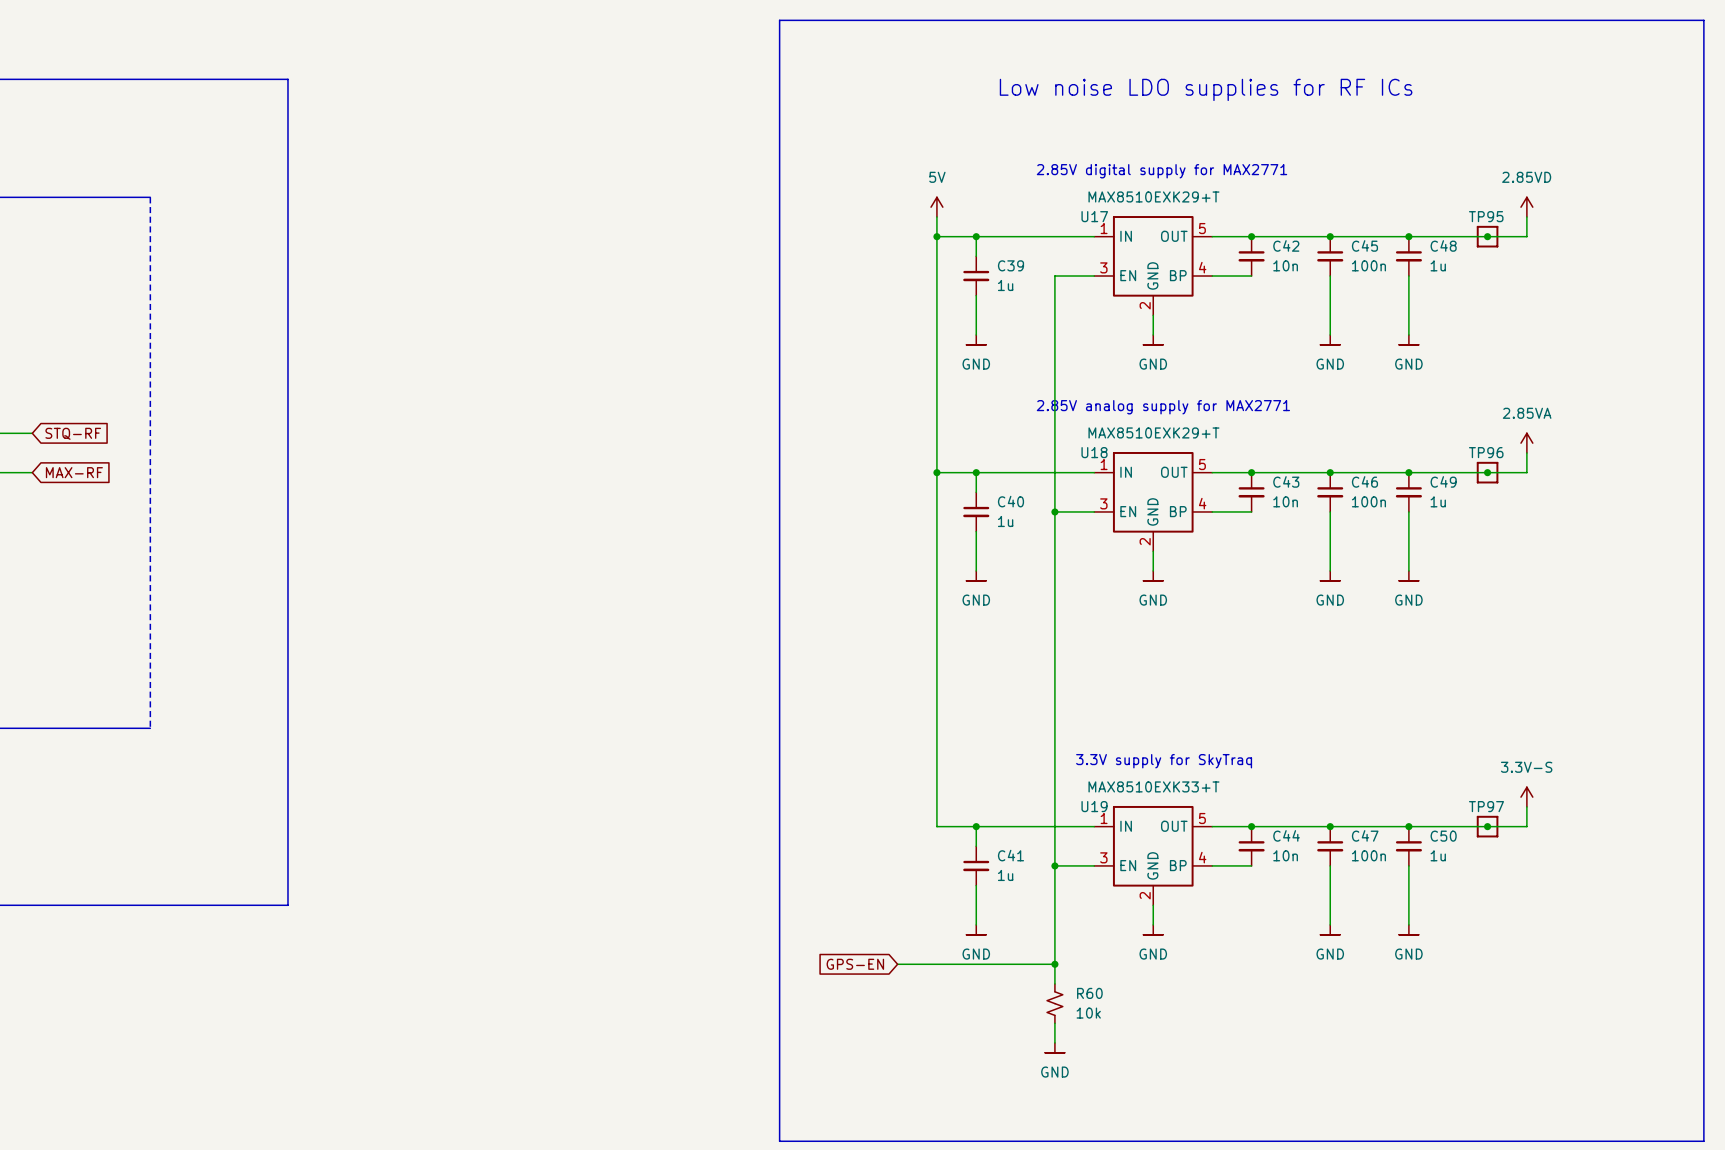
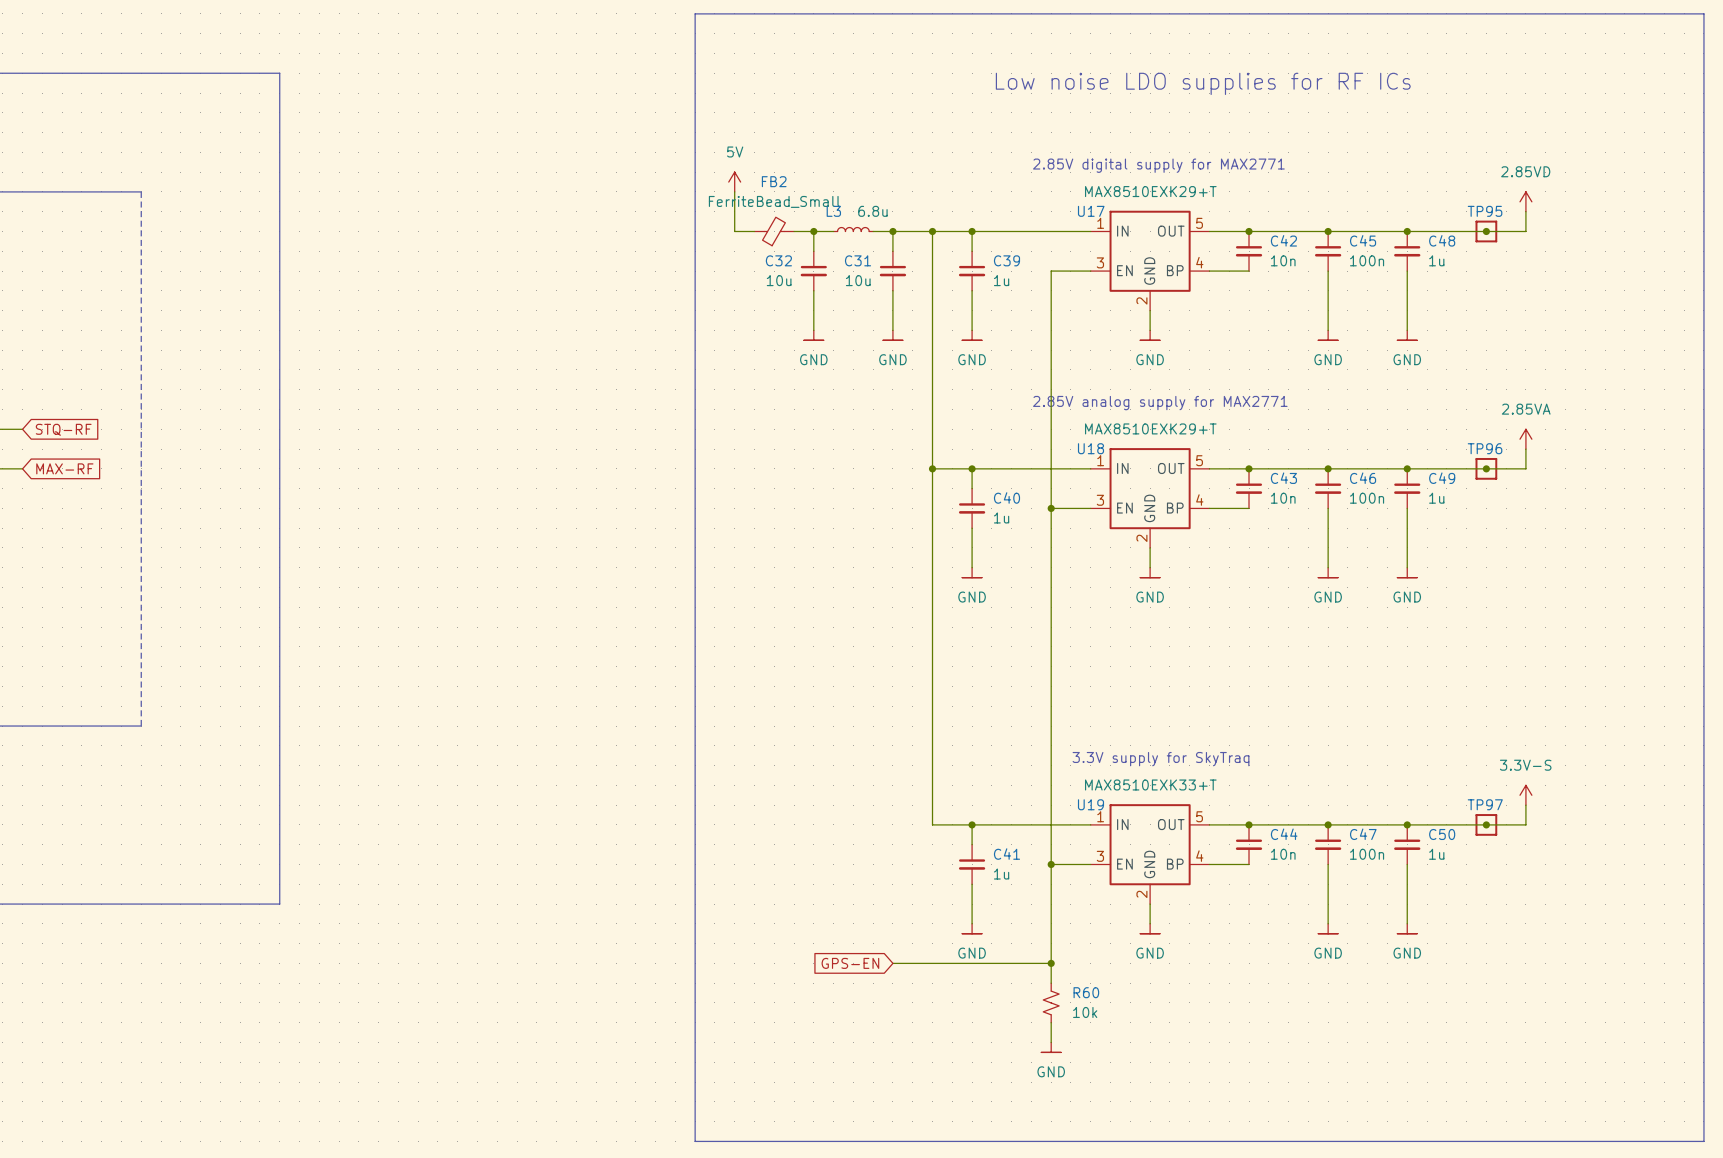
line: (779, 20) (779, 1141) -> (774, 13) (695, 13) (695, 1141) (774, 1141)
power symbol: none -> 5V (734, 182)
wire: none -> (734, 191) (734, 231) (754, 231)
power symbol: 5V (936, 207) -> none
wire: (936, 217) (936, 236) -> (873, 231) (932, 231)
L3: none -> 6.8u (853, 229)
FB2: none -> FerriteBead_Small (774, 231)
wire: none -> (794, 231) (833, 231)
wire: none -> (813, 231) (813, 251)
junction: none -> (813, 231)
wire: none -> (892, 231) (892, 251)
junction: none -> (892, 231)
C32: none -> 10u (813, 271)
C31: none -> 10u (892, 271)
wire: none -> (813, 290) (813, 330)
wire: none -> (892, 290) (892, 330)
power symbol: none -> GND (813, 335)
power symbol: none -> GND (892, 335)

